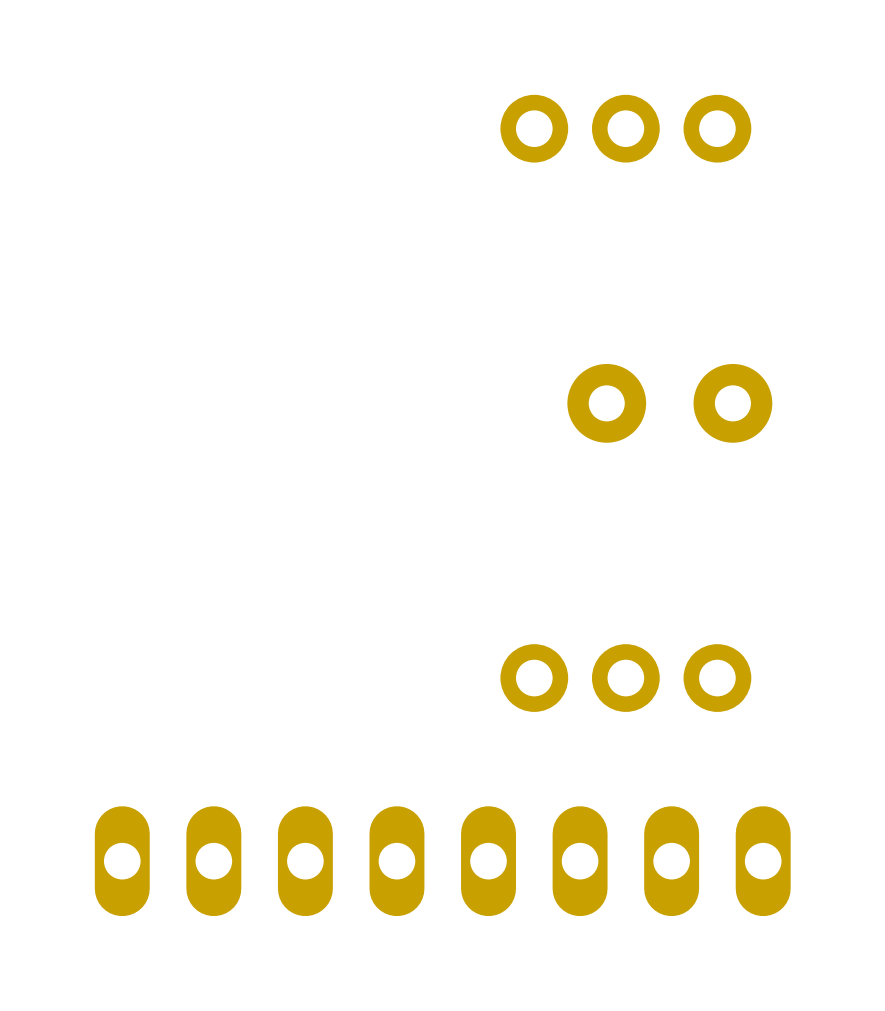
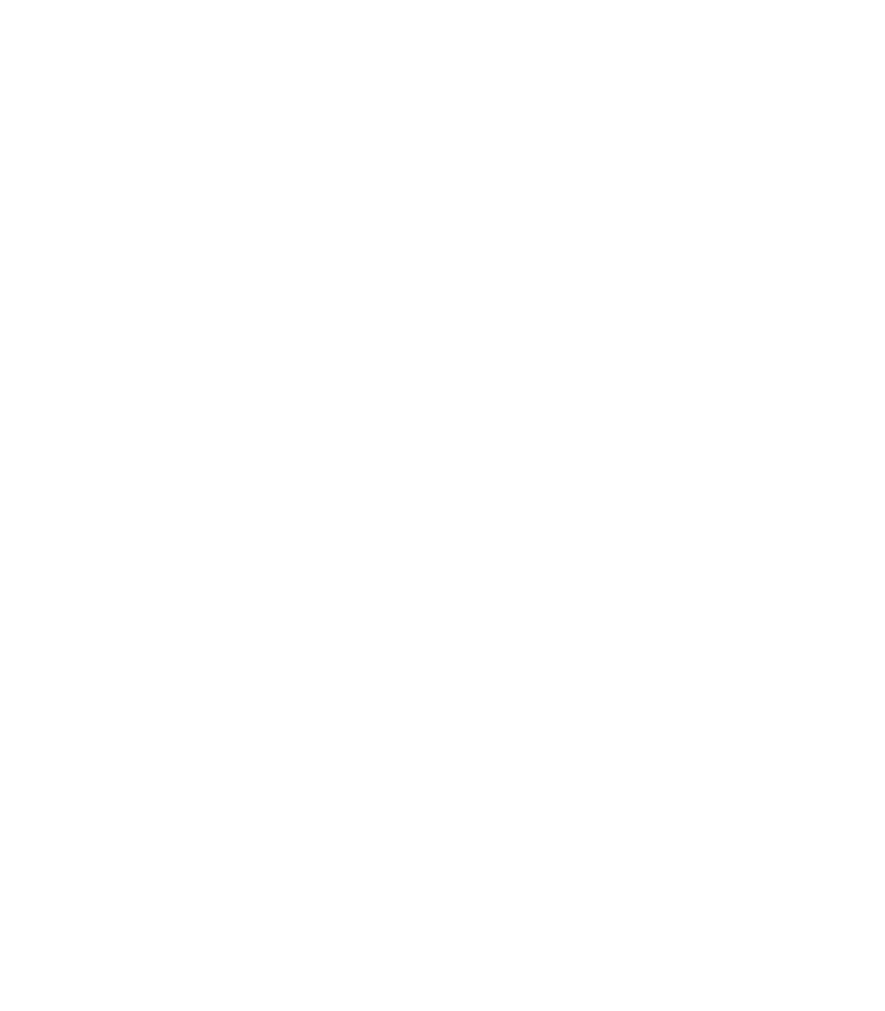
part: (625, 128) -> none
part: (669, 403) -> none
part: (625, 678) -> none
part: (442, 861) -> none

